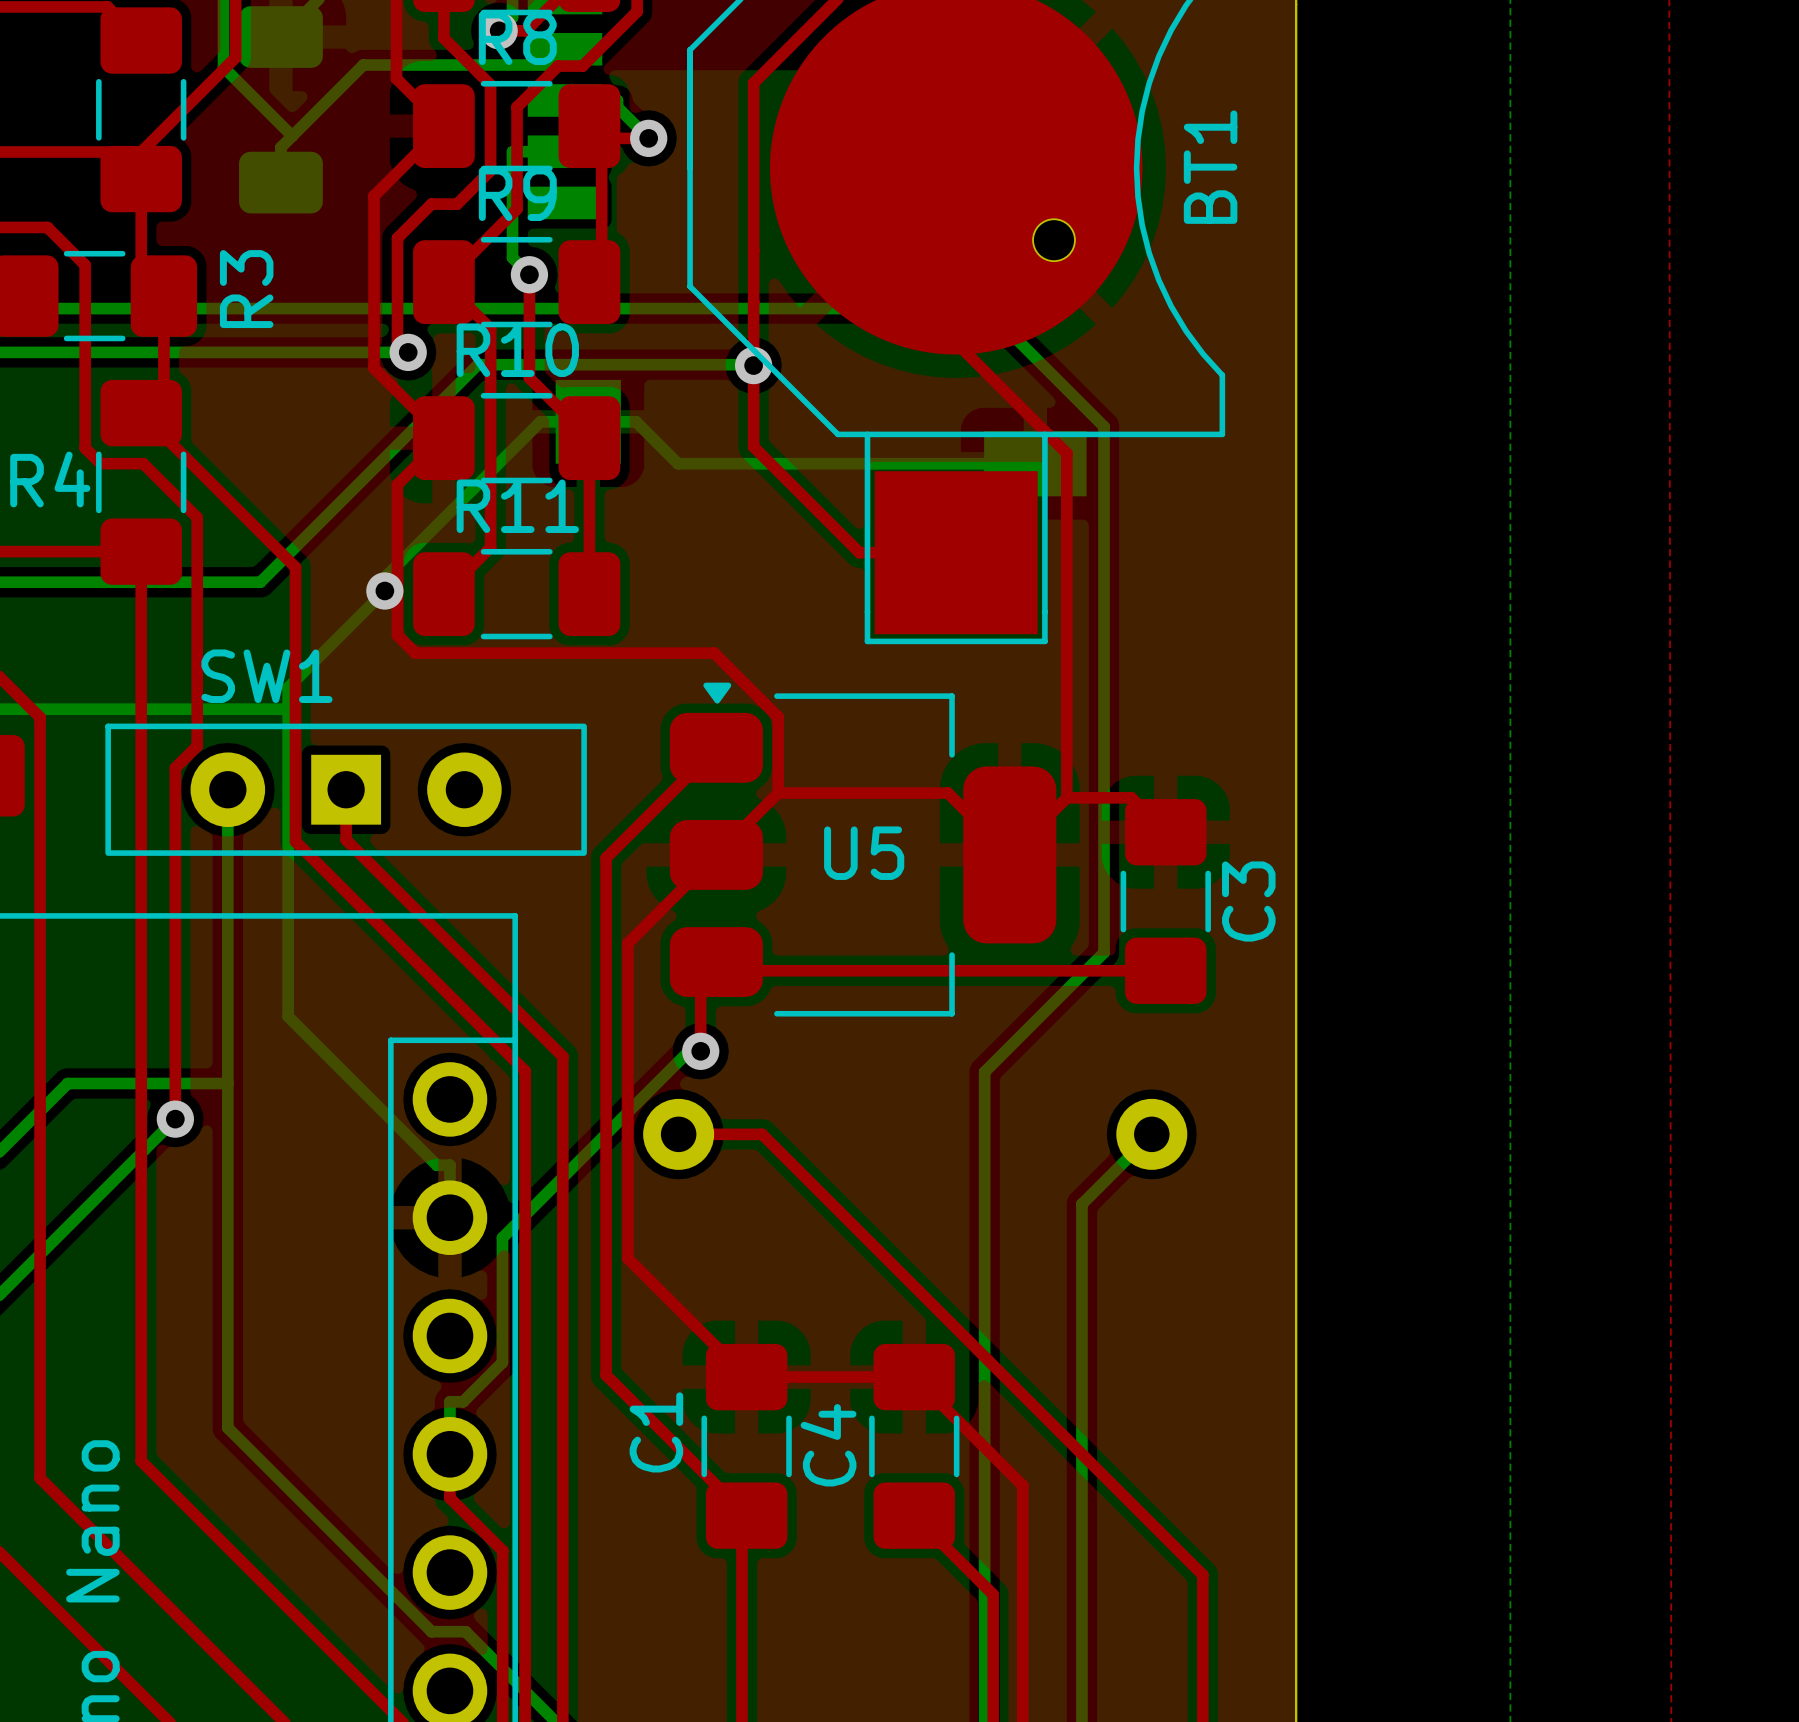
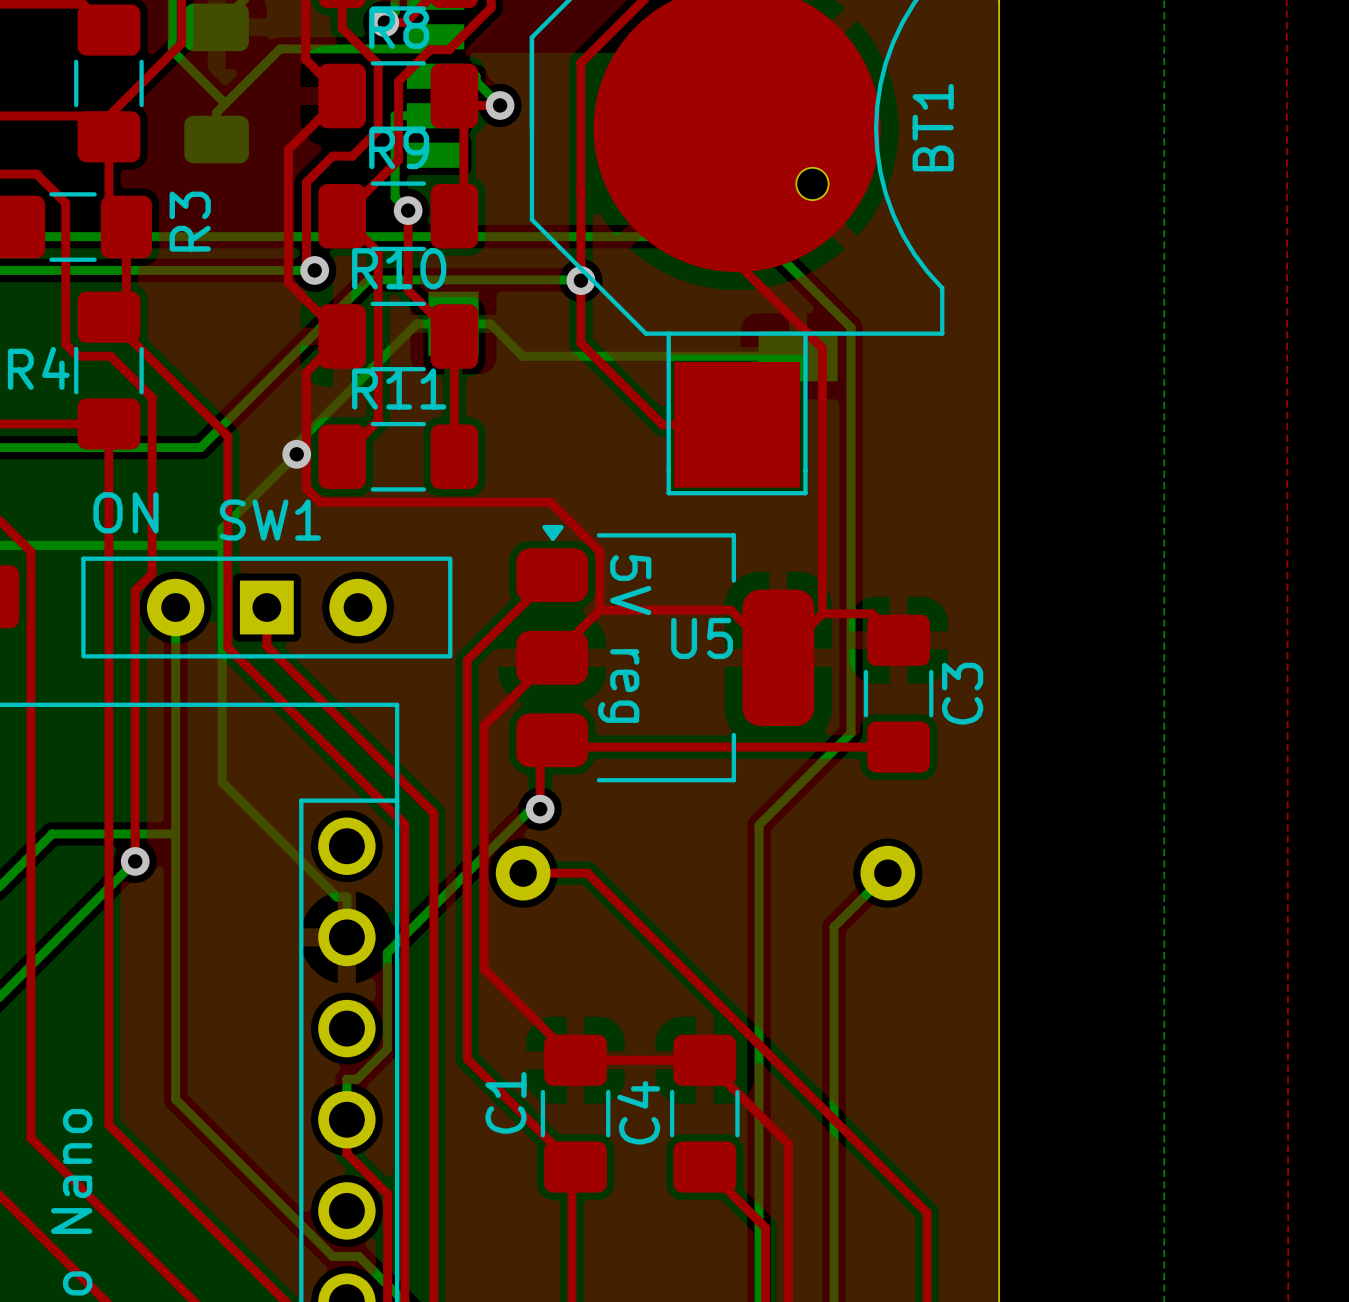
text: none -> ON (126, 512)
SW1 name position: SW1 (266, 676) -> SW1 (270, 520)
text: none -> 5V reg (624, 638)
U5 name position: U5 (864, 853) -> U5 (702, 638)

